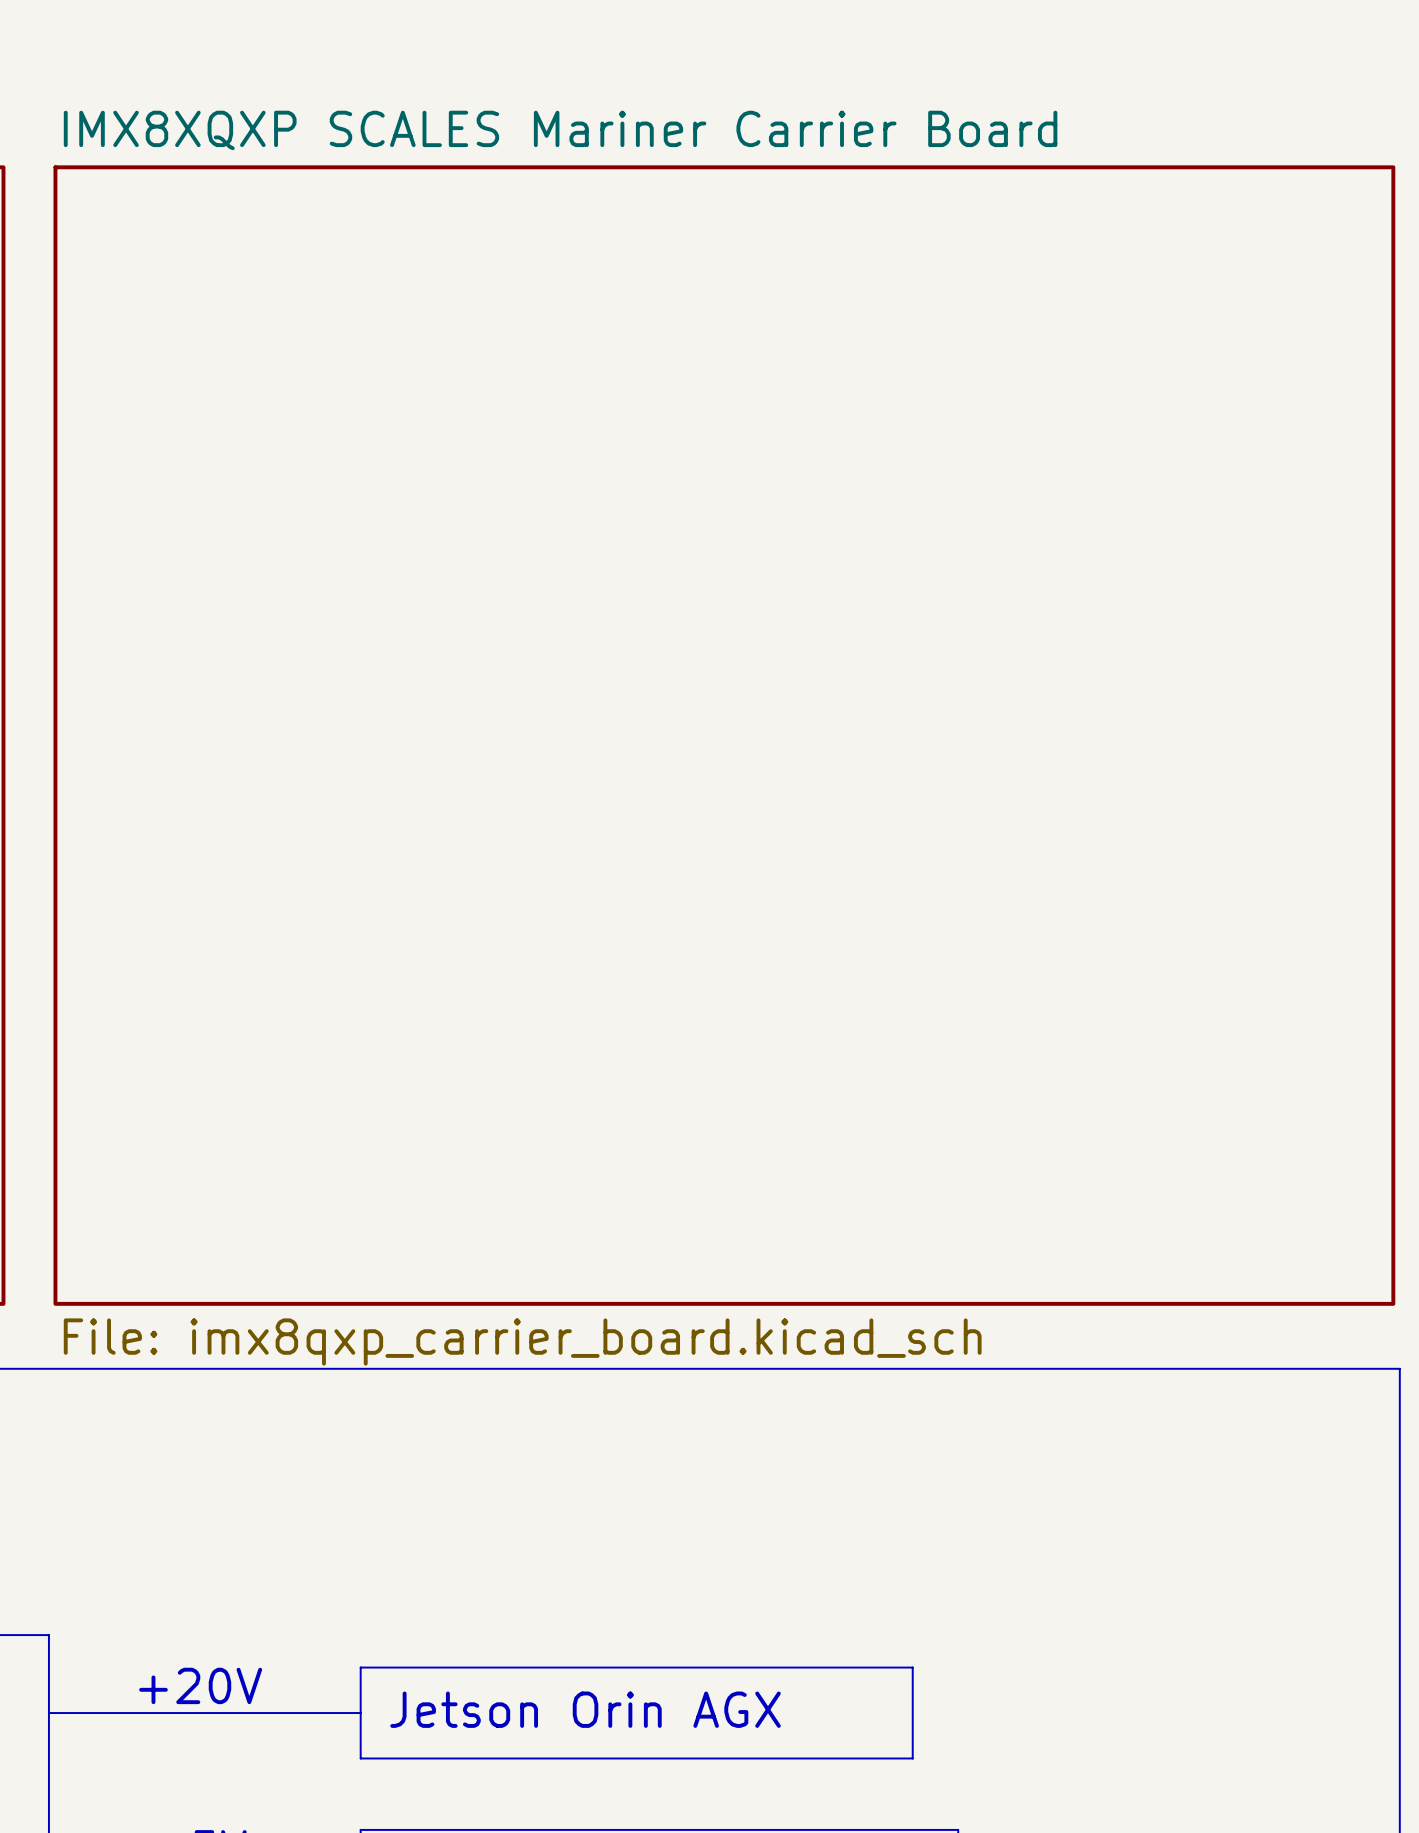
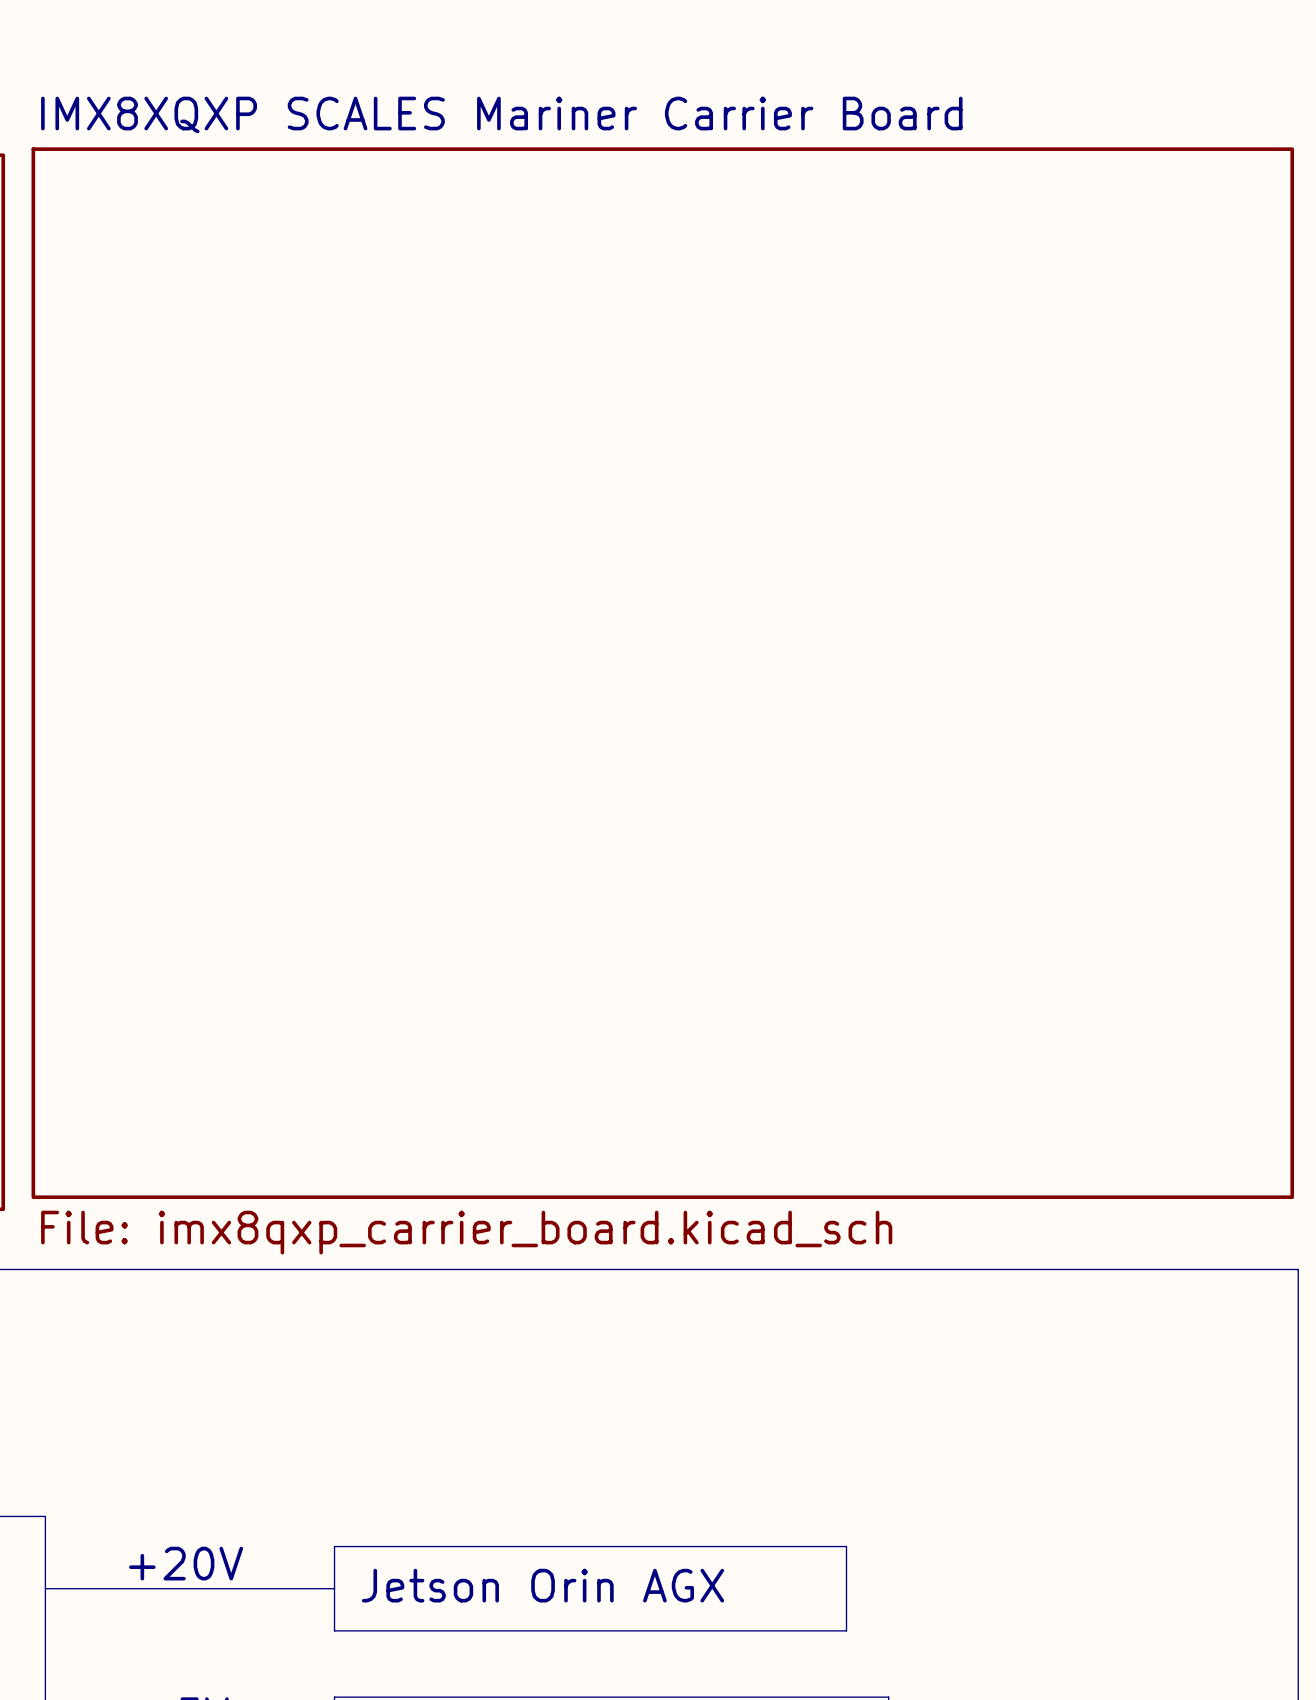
sheet IMX8XQXP SCALES Mariner Carrier Board name position: IMX8XQXP SCALES Mariner Carrier Board (560, 130) -> IMX8XQXP SCALES Mariner Carrier Board (501, 114)
sheet IMX8XQXP SCALES Mariner Carrier Board shape: [53, 165, 1396, 1306] -> [31, 147, 1295, 1200]
sheet IMX8XQXP SCALES Mariner Carrier Board value position: File: imx8qxp_carrier_board.kicad_sch (522, 1342) -> File: imx8qxp_carrier_board.kicad_sch (466, 1232)

